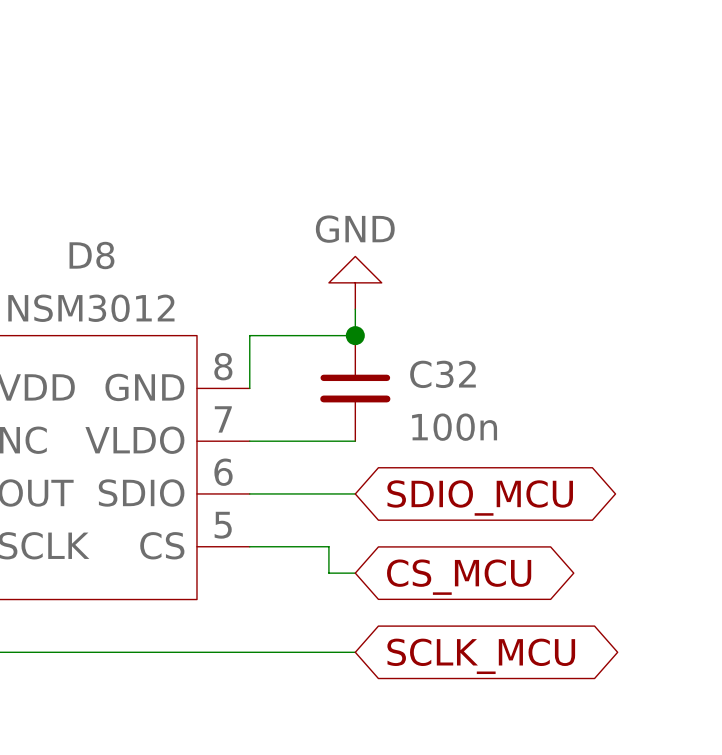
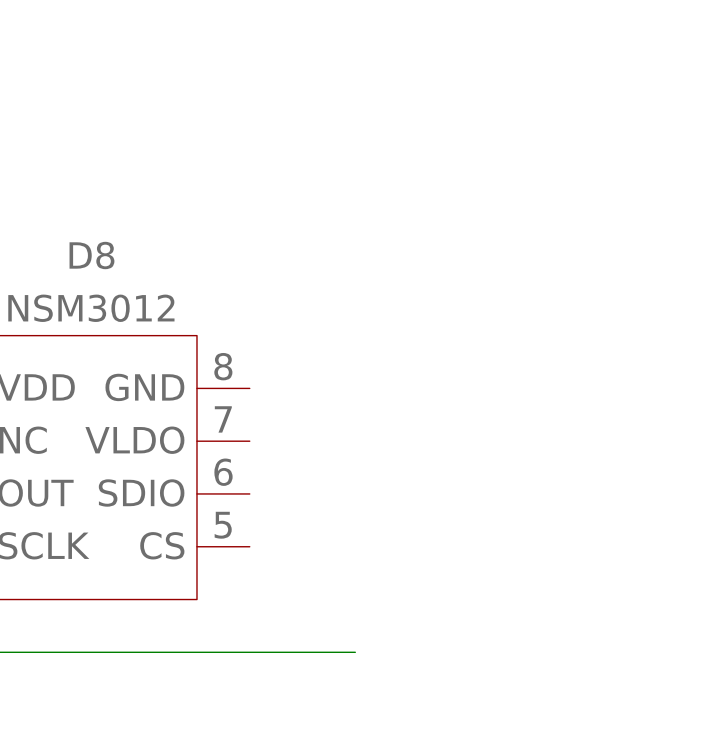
power symbol: GND (355, 282) -> none
wire: (355, 309) (355, 335) (249, 335) (249, 388) -> none
junction: (355, 335) -> none
C32: 100n (355, 388) -> none
wire: (249, 441) (355, 441) -> none
wire: (249, 493) (355, 493) -> none
global label: SDIO_MCU (480, 498) -> none
wire: (249, 546) (328, 546) (328, 573) (355, 573) -> none
global label: CS_MCU (459, 577) -> none
global label: SCLK_MCU (481, 656) -> none

